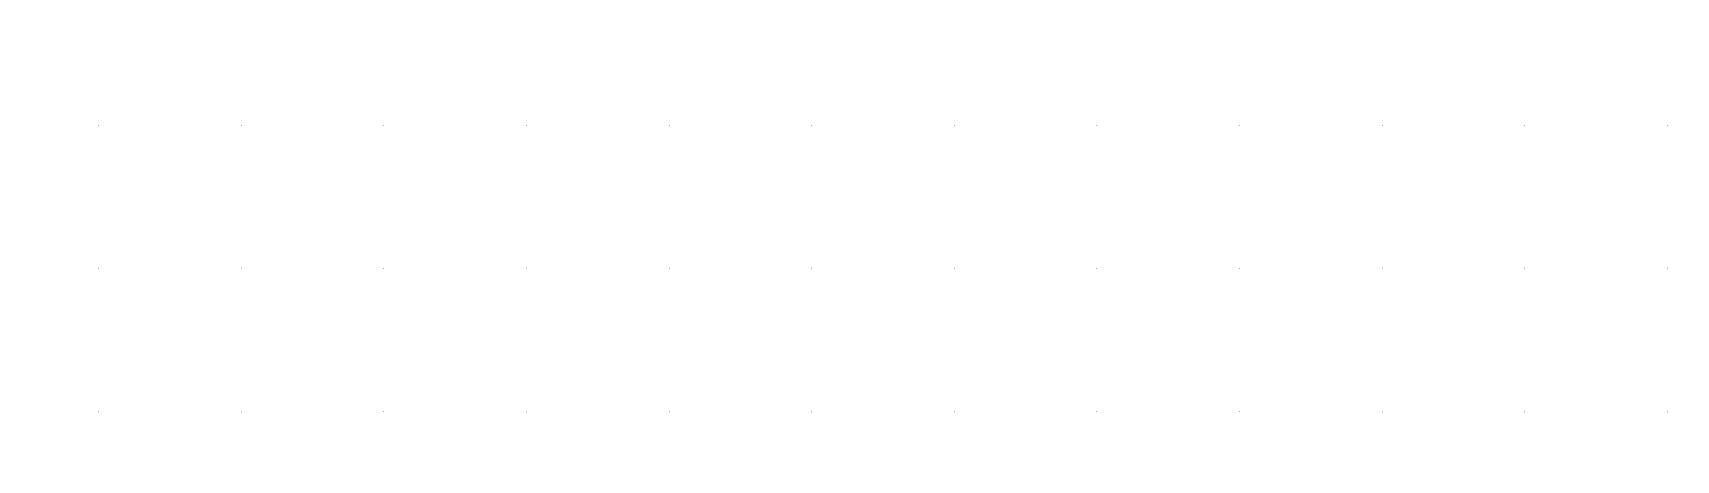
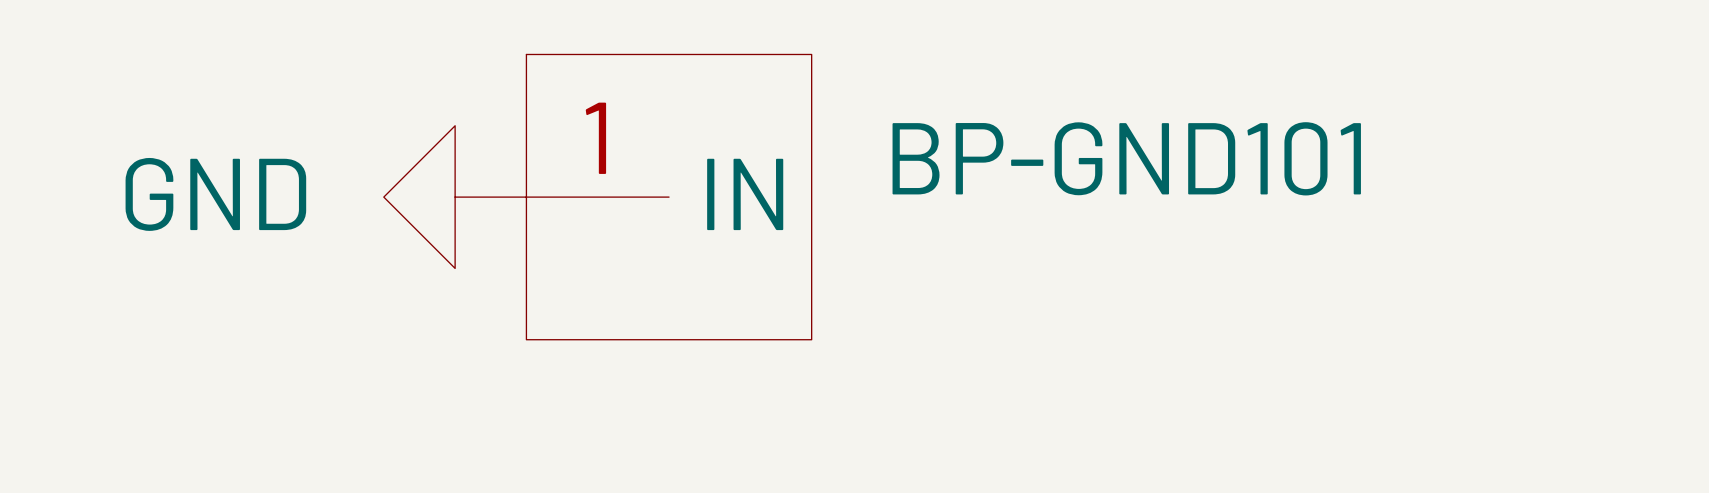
power symbol: none -> GND (455, 197)
BP-GND101: none -> (669, 197)

